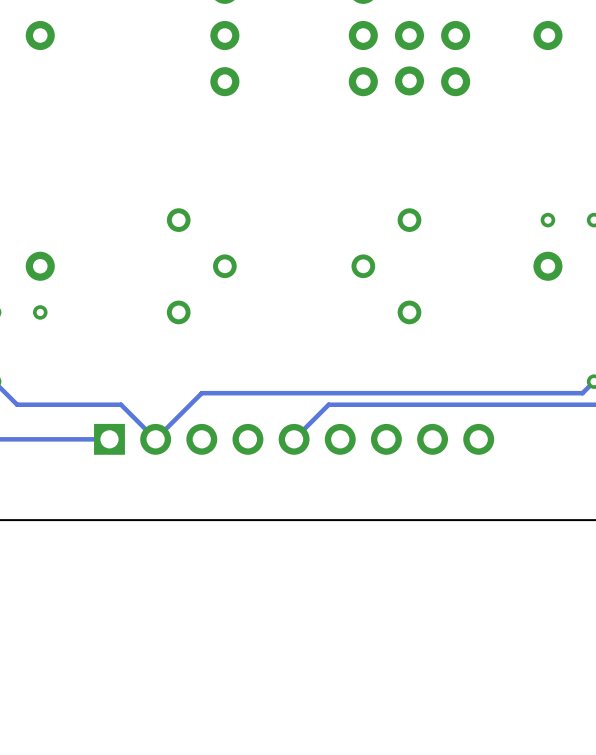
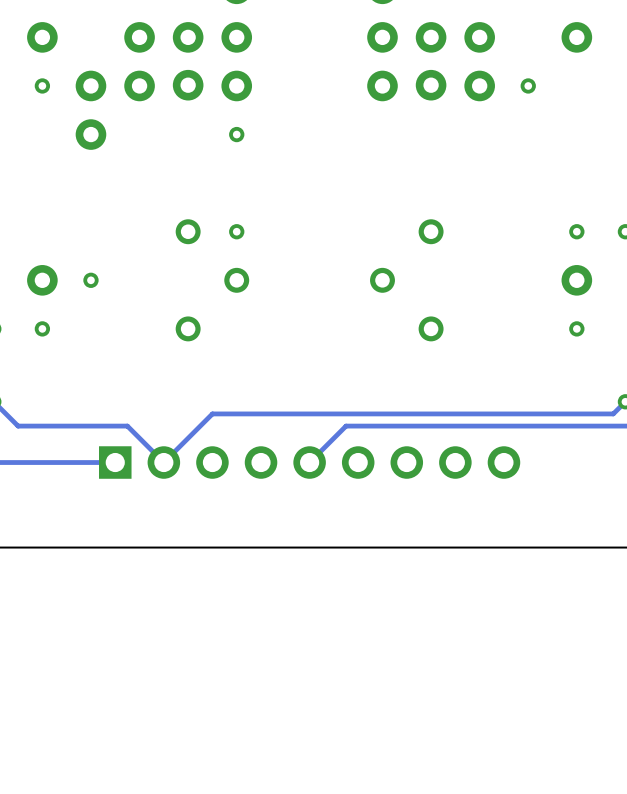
part: none -> (139, 61)
part: none -> (188, 61)
via: none -> (42, 85)
via: none -> (528, 85)
part: none -> (90, 110)
via: none -> (236, 134)
via: none -> (236, 231)
via: none -> (90, 280)
via: none -> (576, 328)

